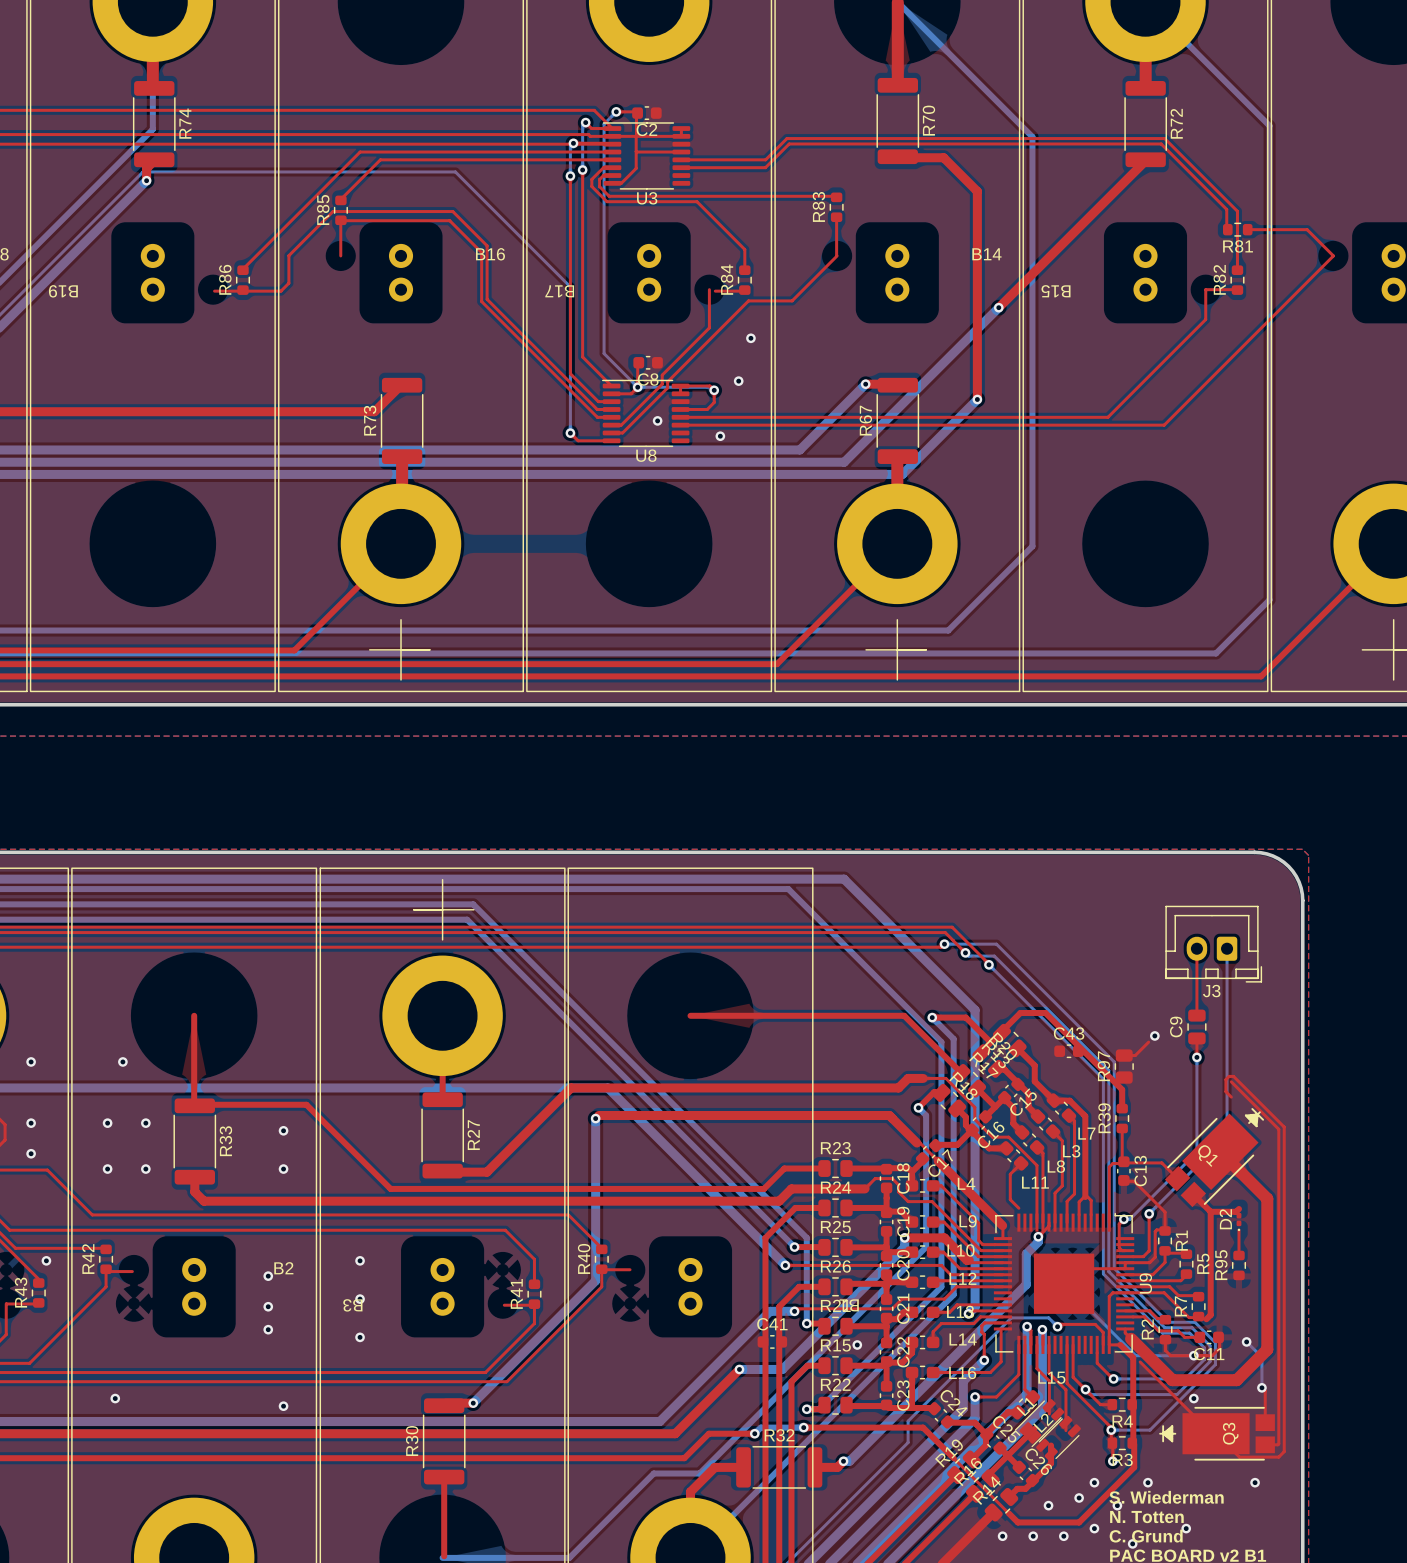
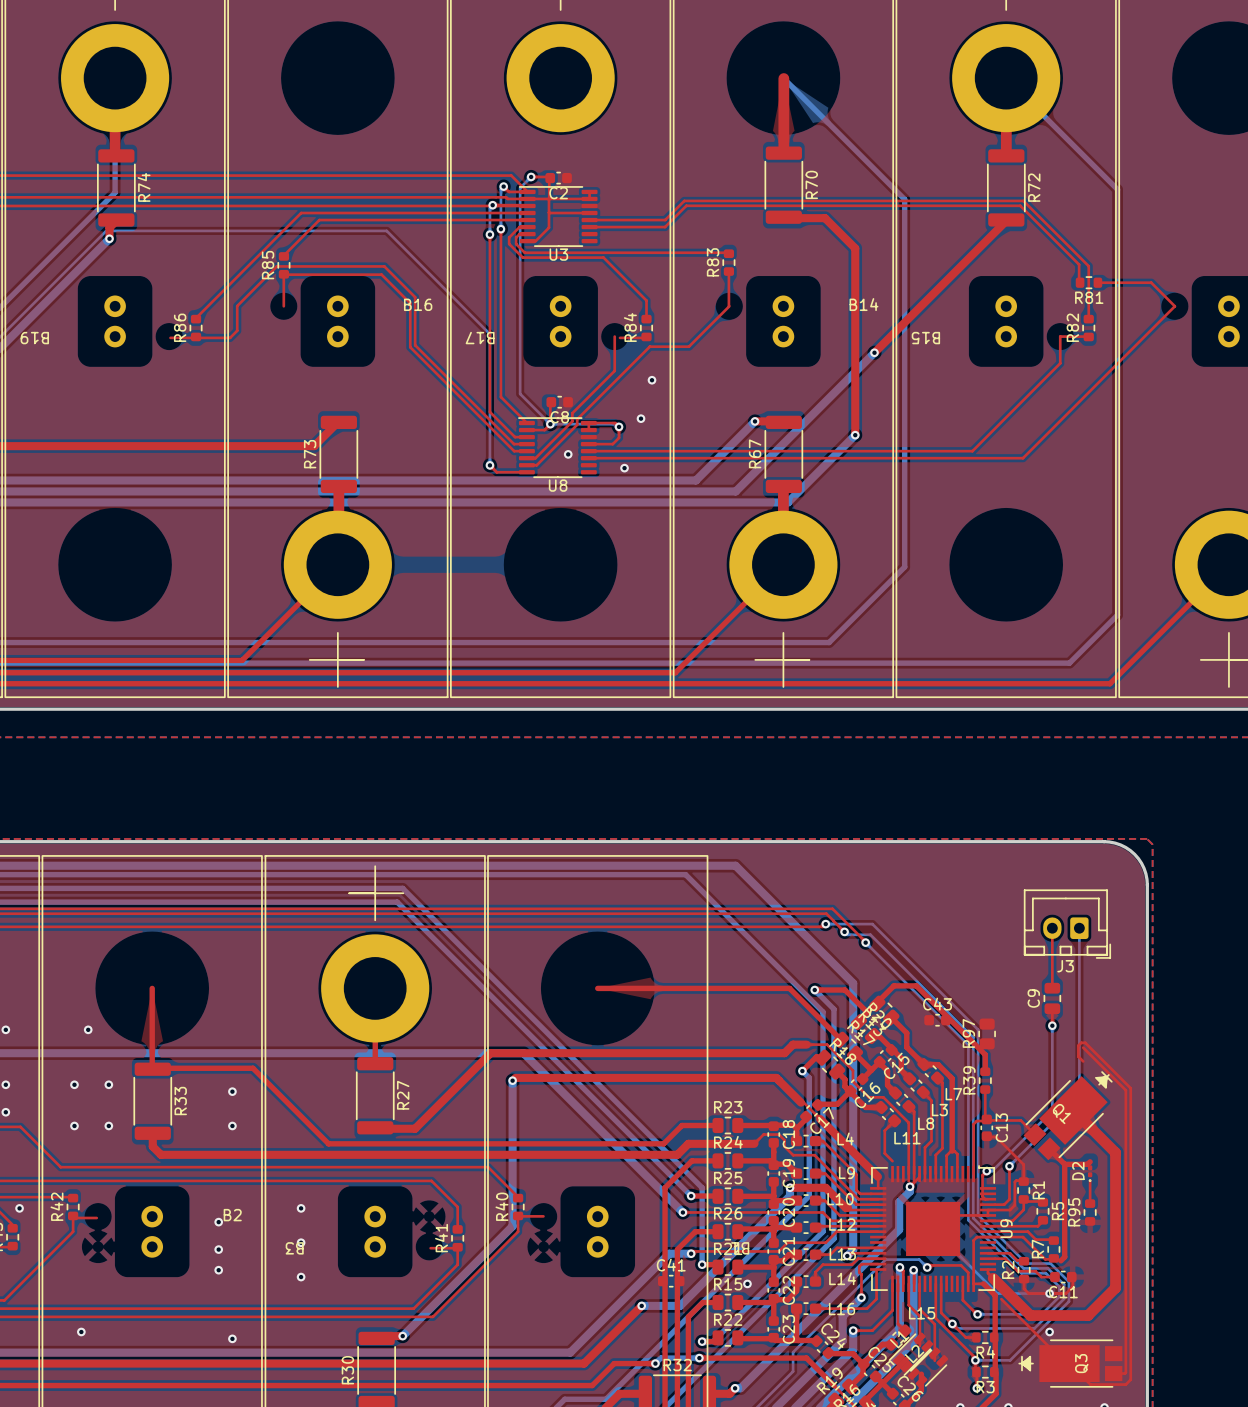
via: (1154, 1035) -> none
top track: (1148, 1042) (1135, 1055) (1124, 1055) -> none
bottom track: (1246, 1341) (1261, 1357) (1261, 1387) -> none
via: (1246, 1341) -> none
top track: (1261, 1387) (1265, 1391) (1265, 1422) -> none
via: (1261, 1387) -> none

